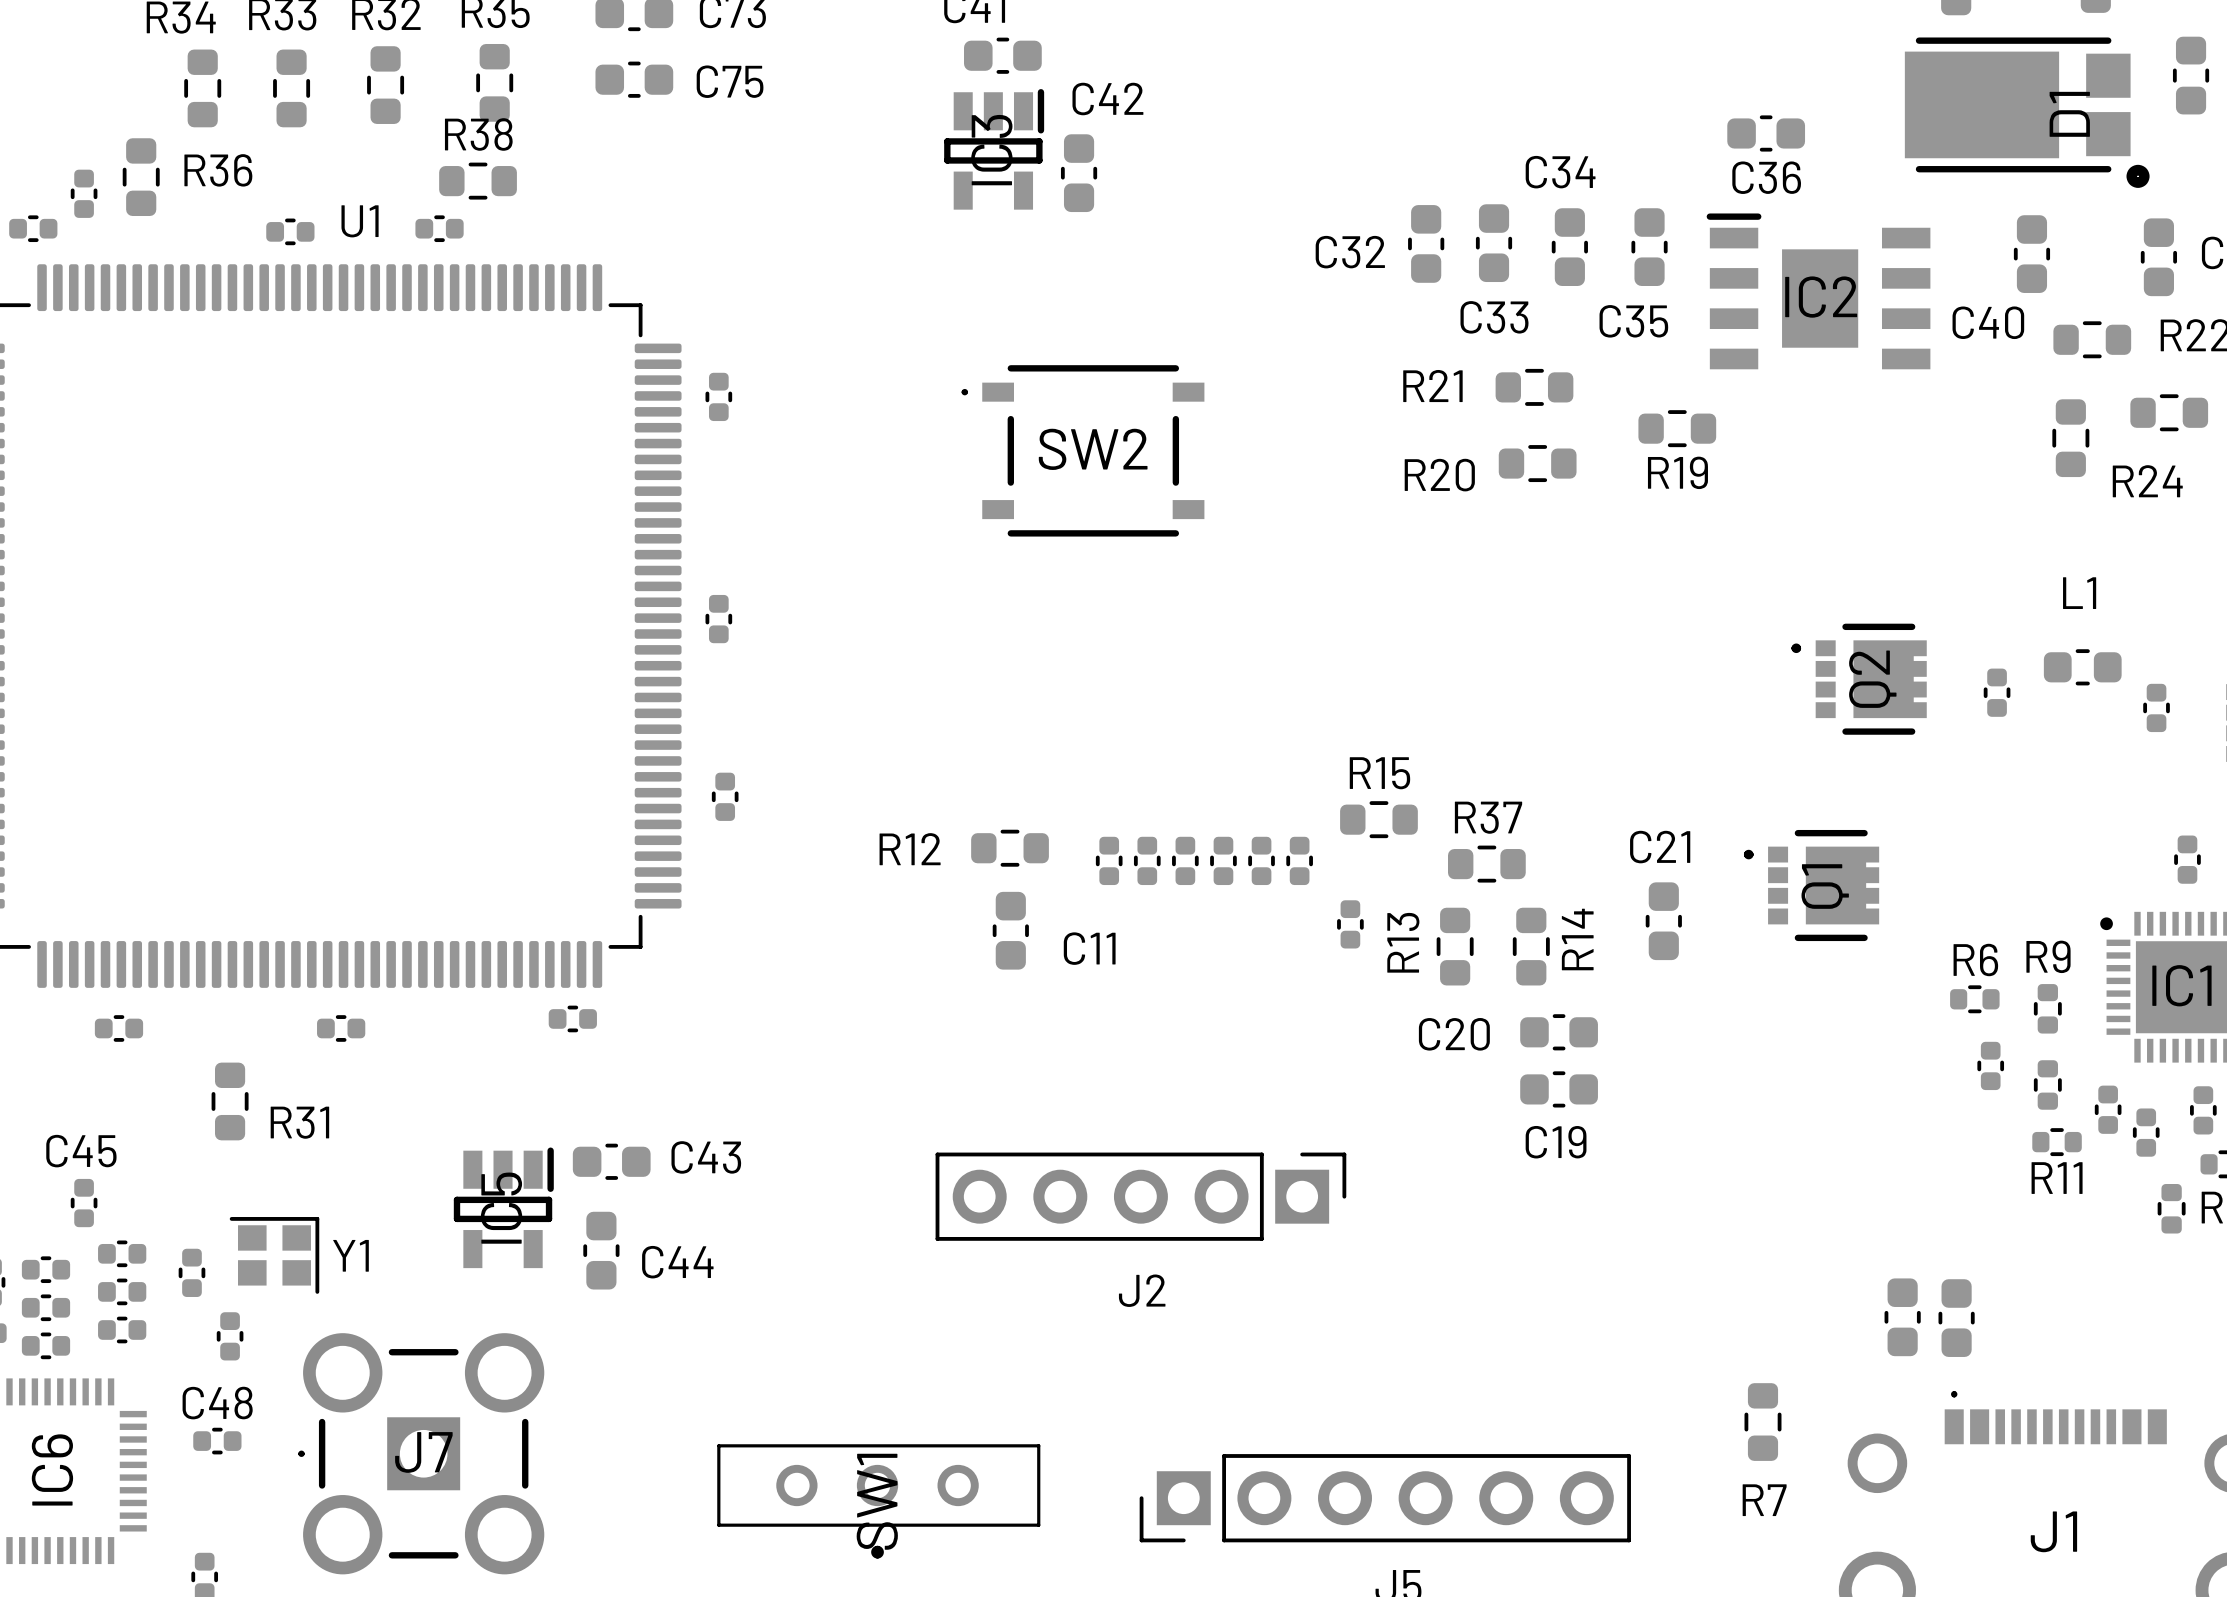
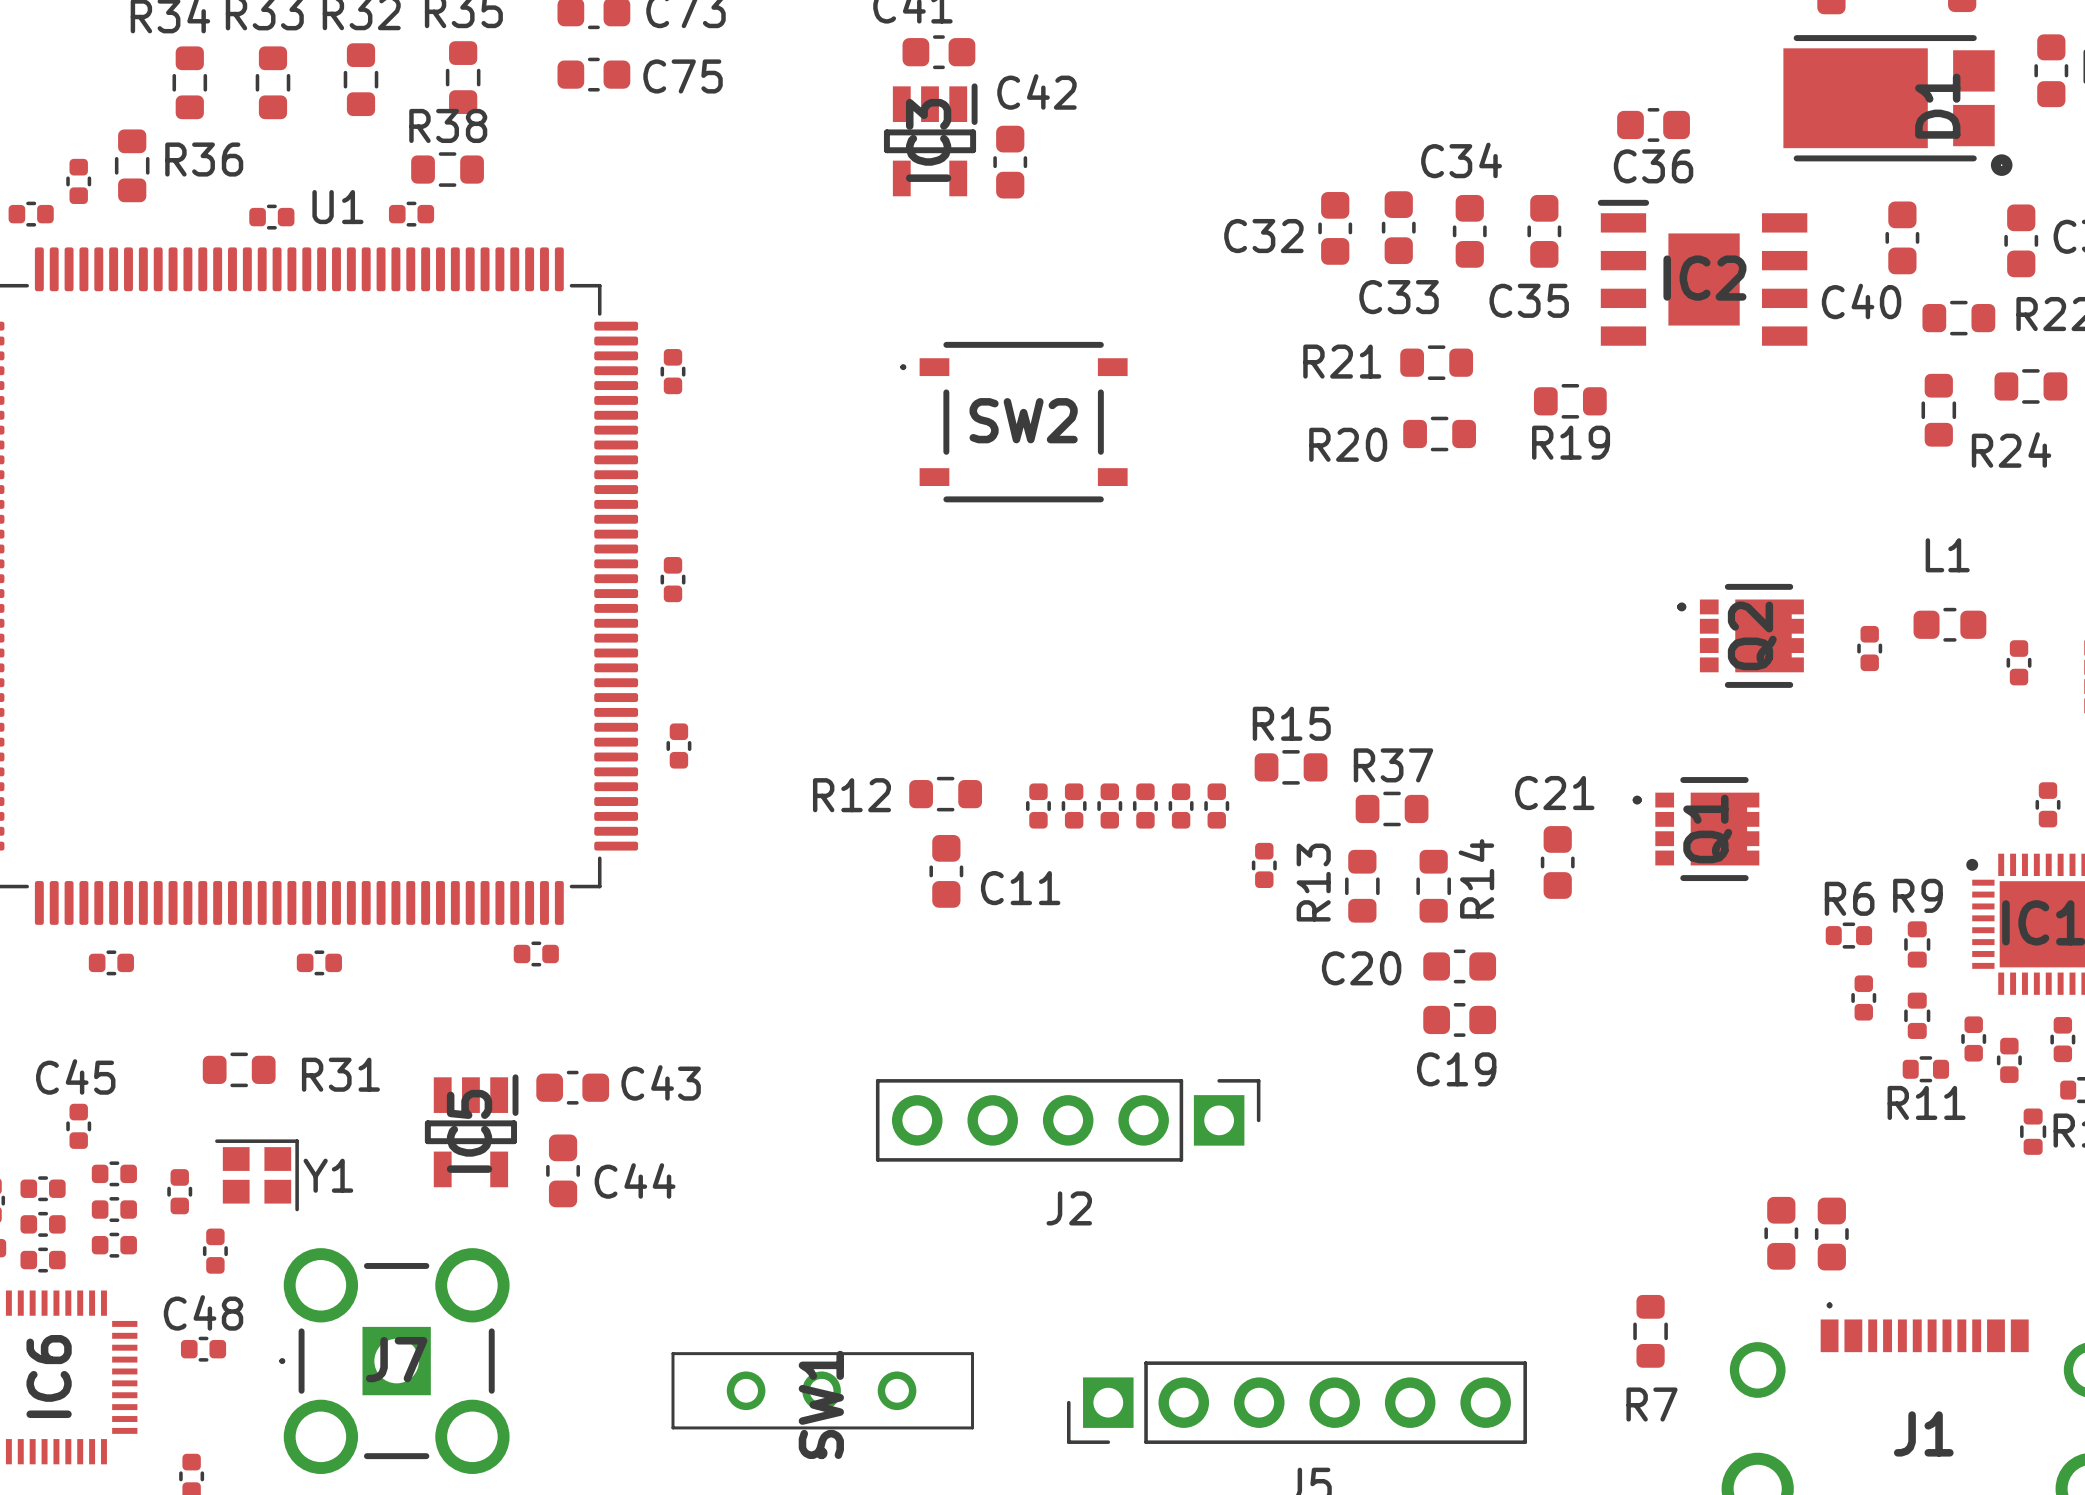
R31 rotation: 0° (230, 1101) -> 90° clockwise (239, 1069)
R31 position: (230, 1101) -> (239, 1069)

